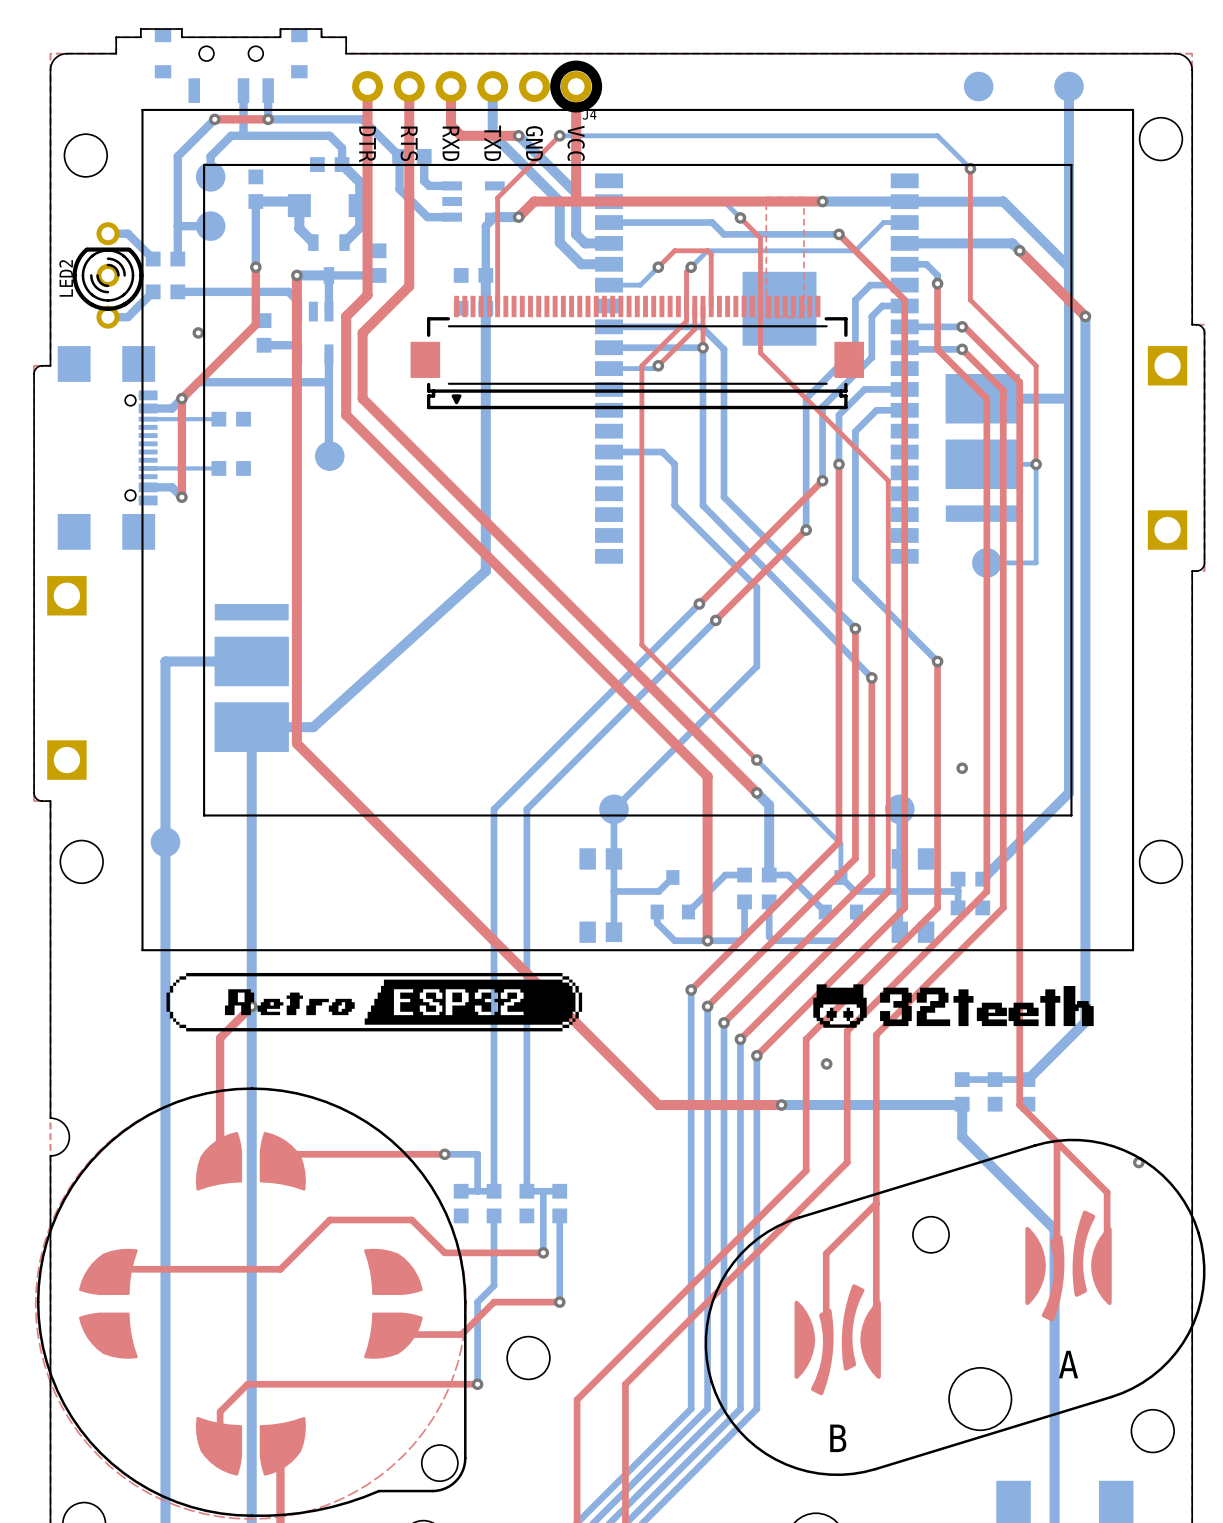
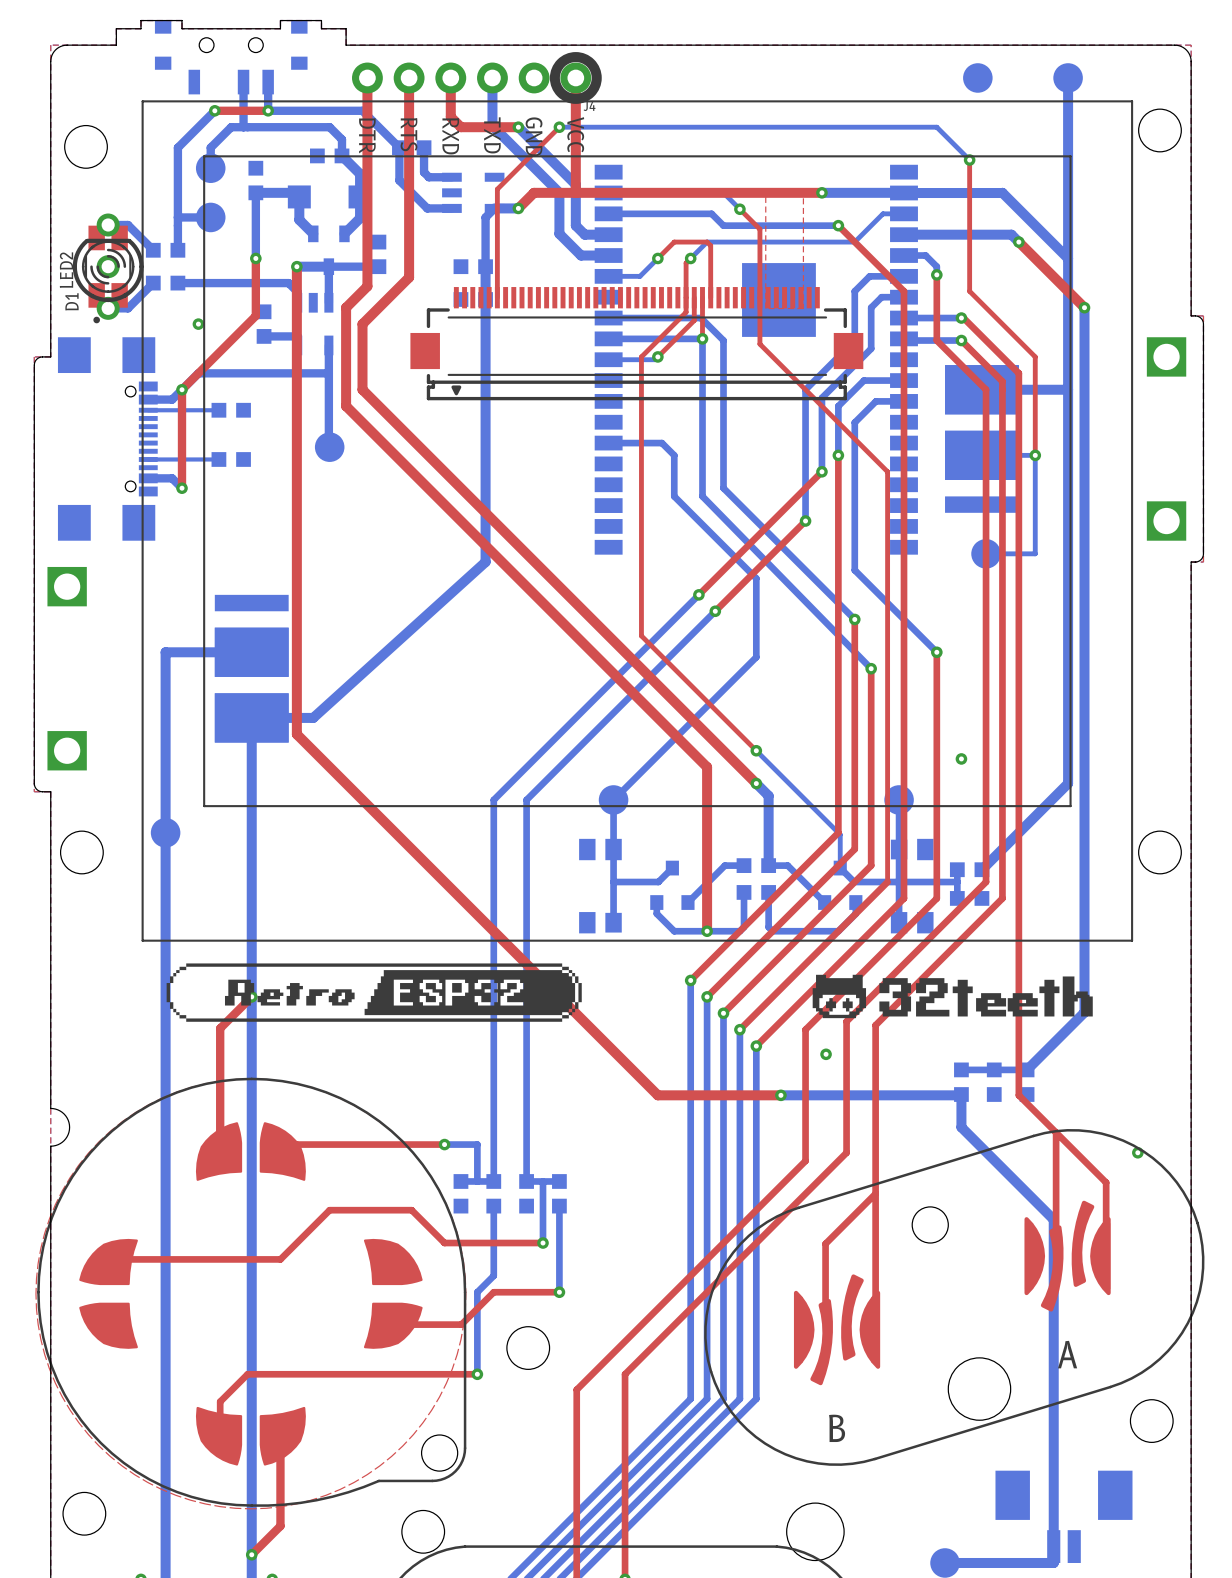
D1: none -> (108, 274)

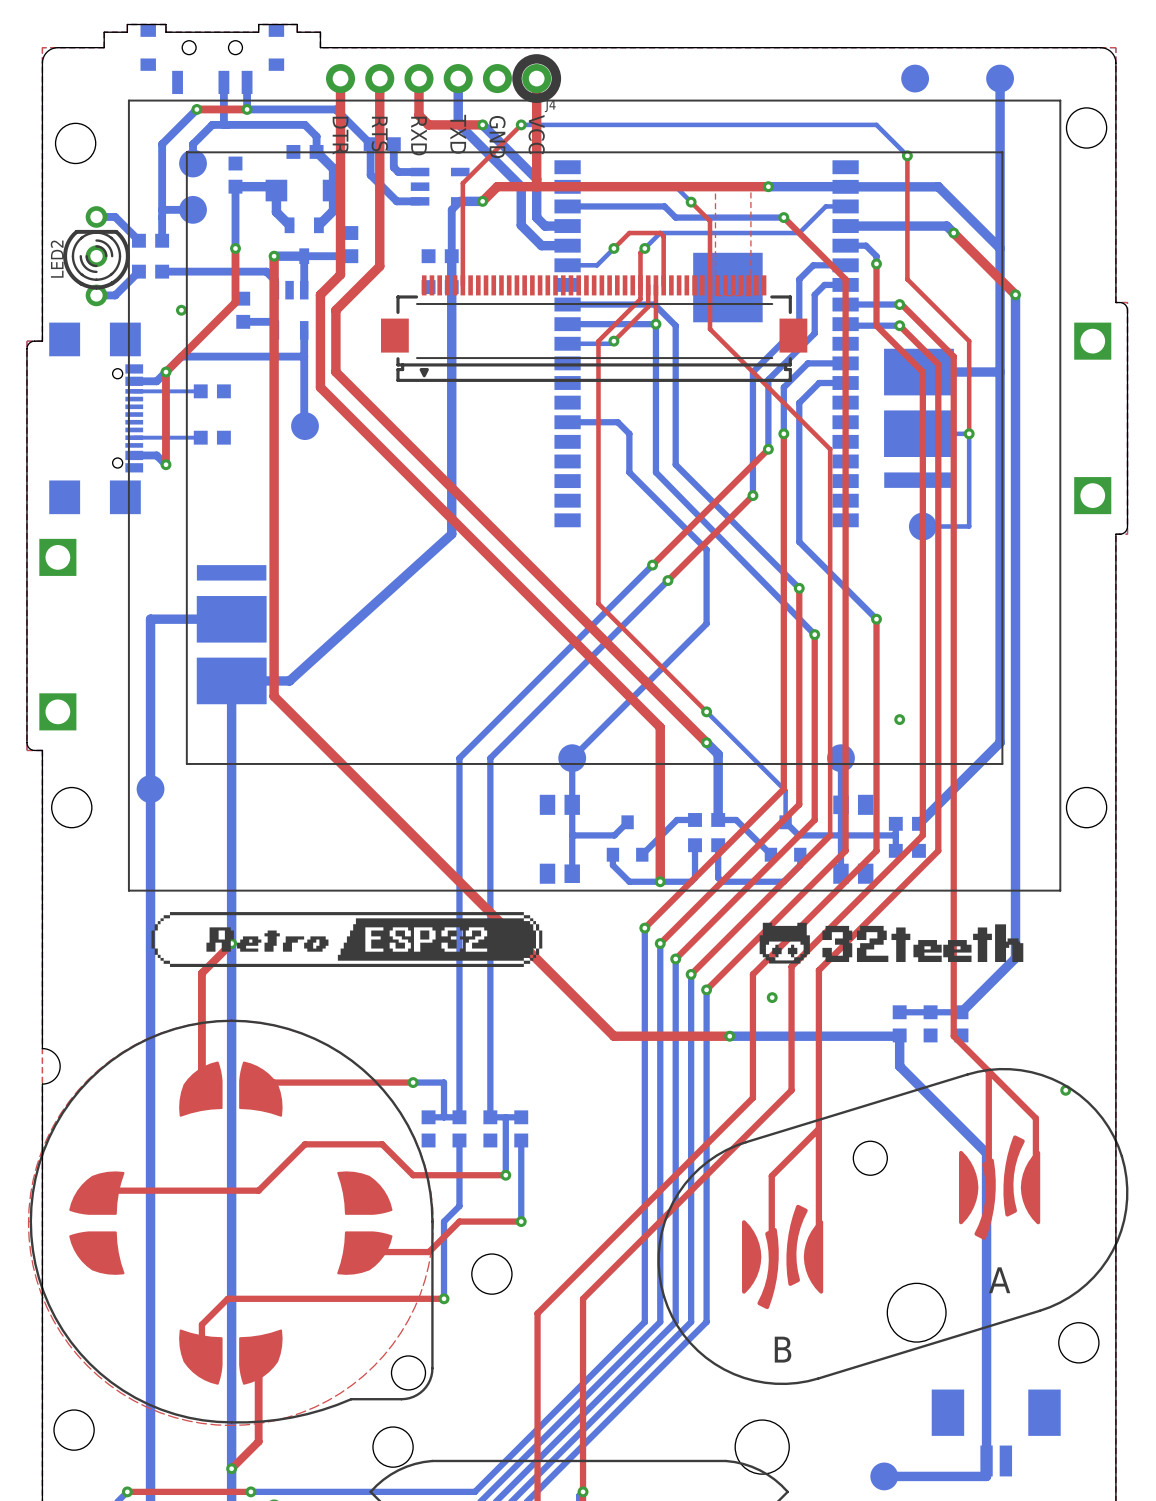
D1: (108, 274) -> none

